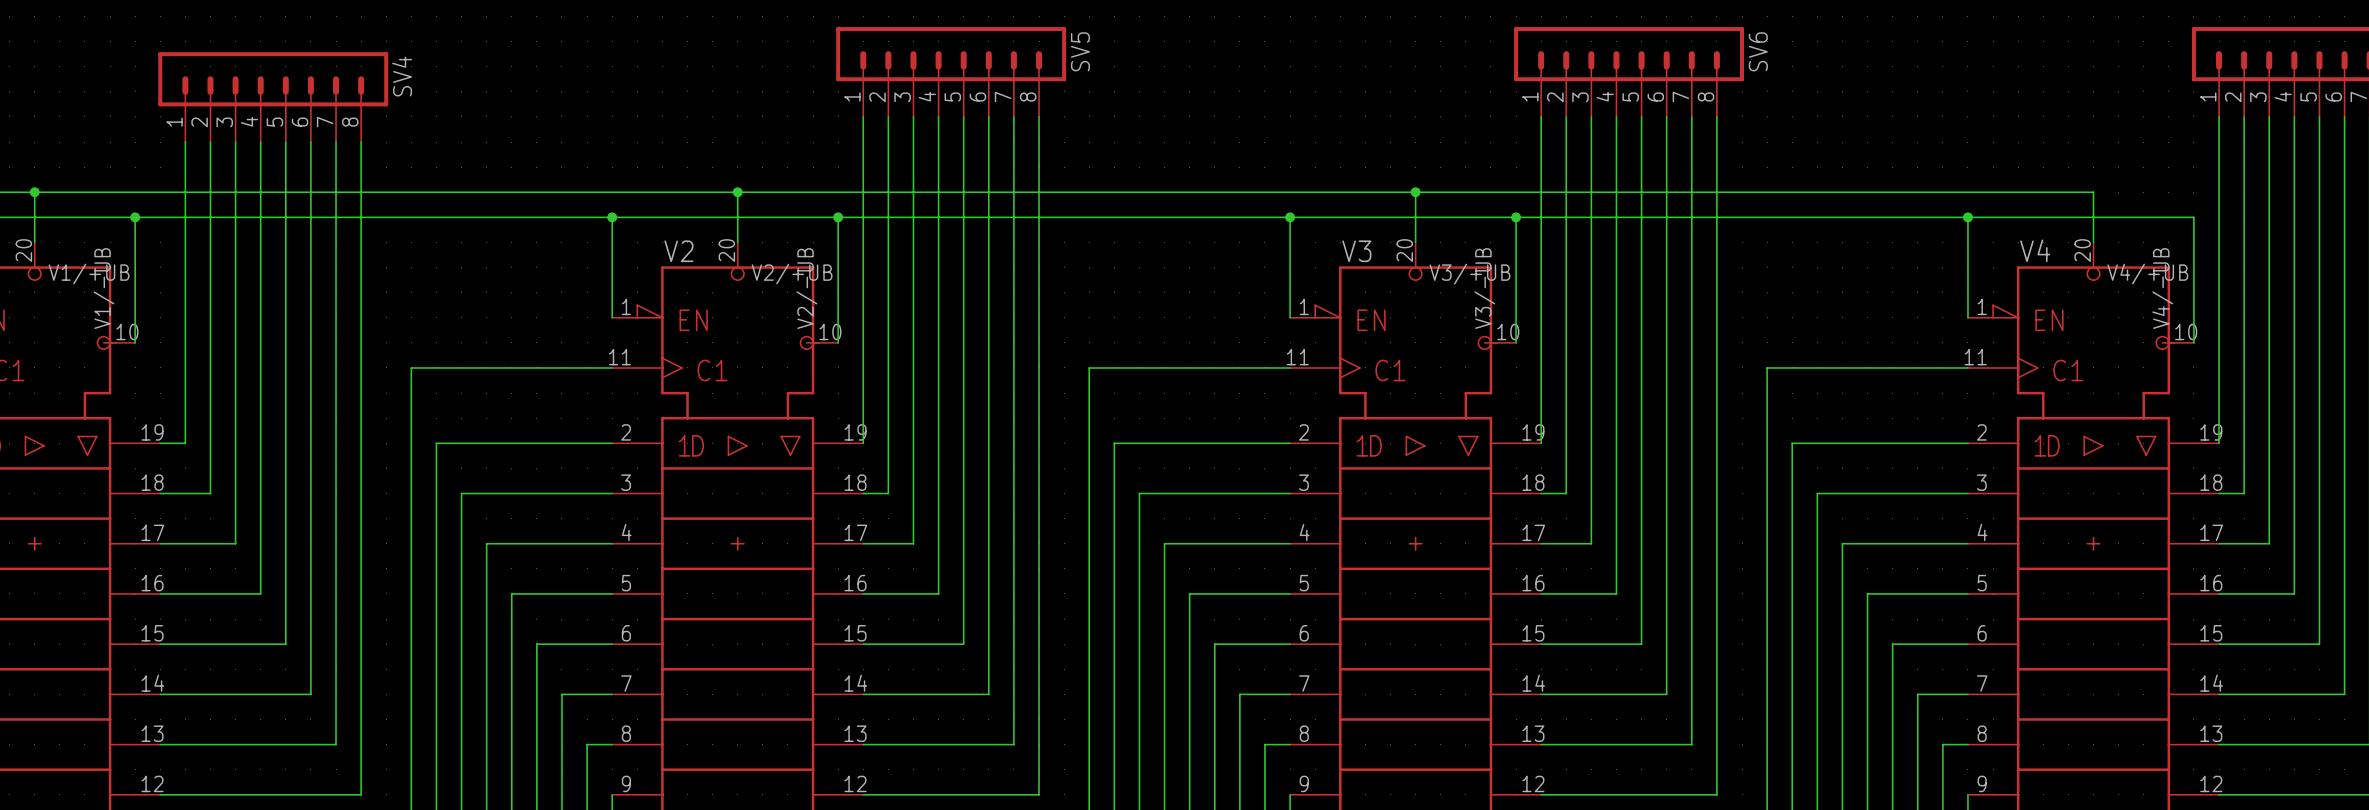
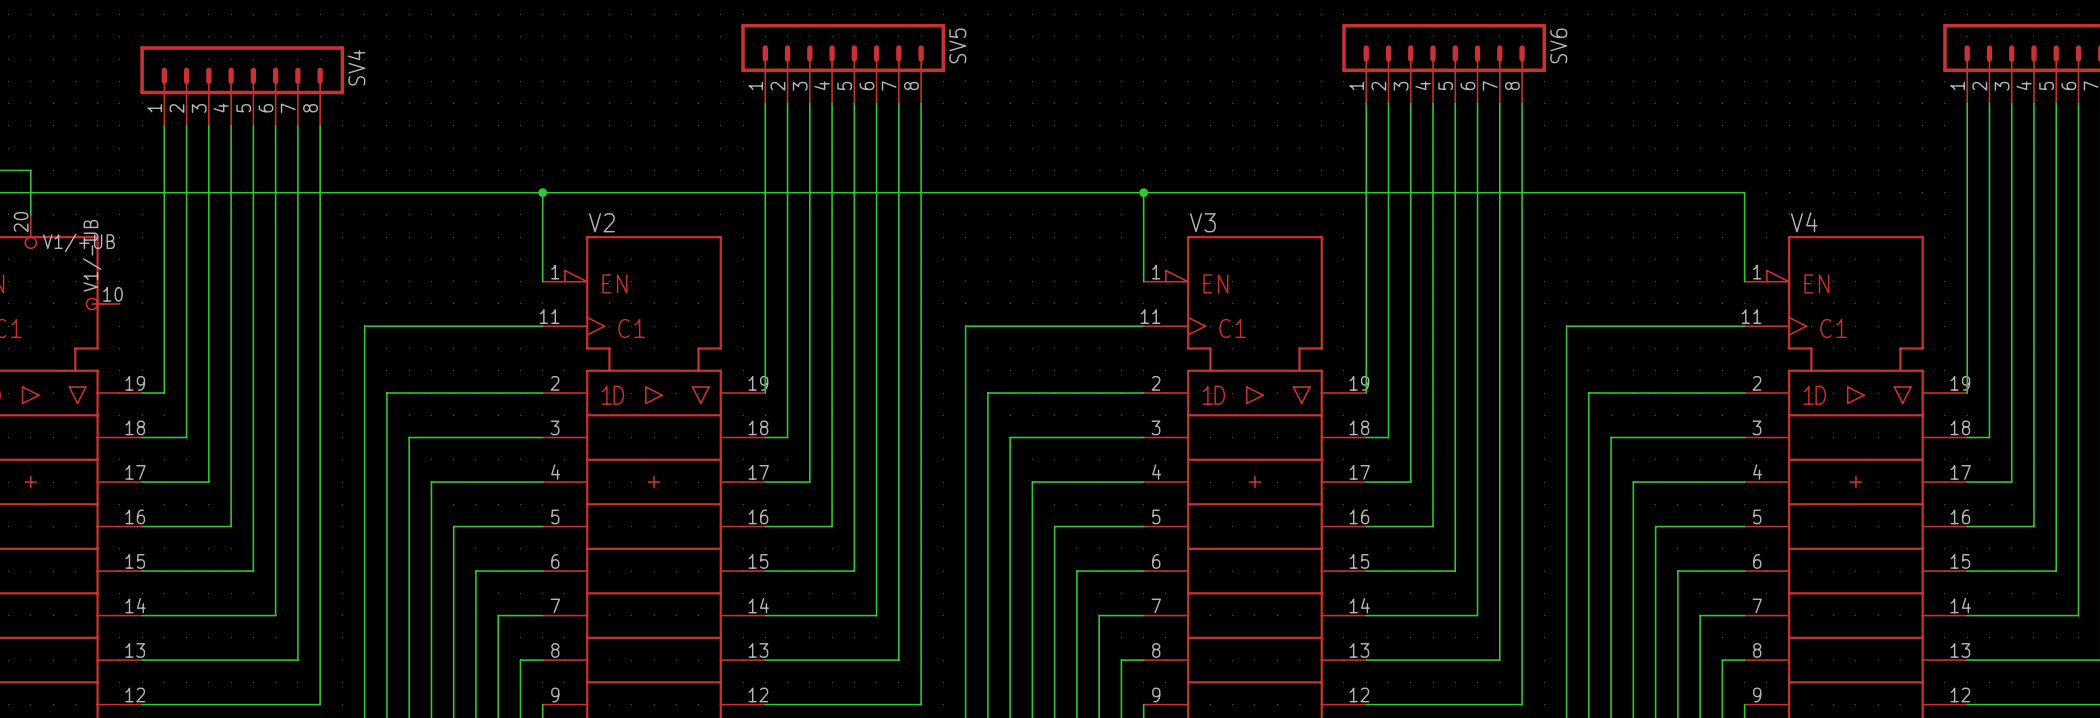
wire: (34, 192) (2093, 192) (2093, 242) -> none
junction: (34, 192) -> none
wire: (737, 192) (737, 242) -> none
junction: (737, 192) -> none
wire: (1415, 192) (1415, 242) -> none
junction: (1415, 192) -> none
wire: (135, 217) (135, 342) -> none
junction: (135, 217) -> none
wire: (838, 217) (838, 342) -> none
junction: (838, 217) -> none
wire: (1516, 217) (1516, 342) -> none
junction: (1516, 217) -> none
wire: (1967, 217) (2193, 217) (2193, 342) -> none
junction: (1967, 217) -> none
V2/+UB: (737, 261) -> none
V3/+UB: (1415, 261) -> none
V4/+UB: (2093, 261) -> none
V2/-UB: (818, 342) -> none
V3/-UB: (1496, 342) -> none
V4/-UB: (2174, 342) -> none

